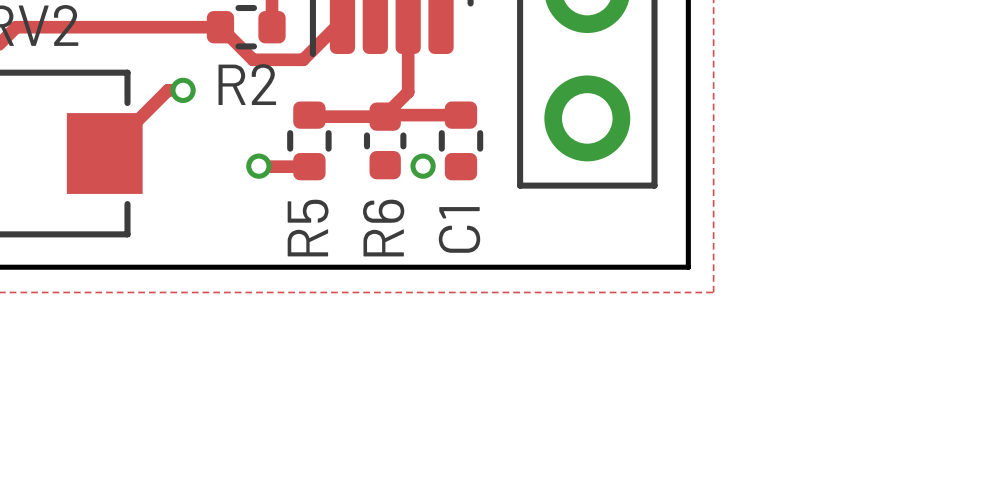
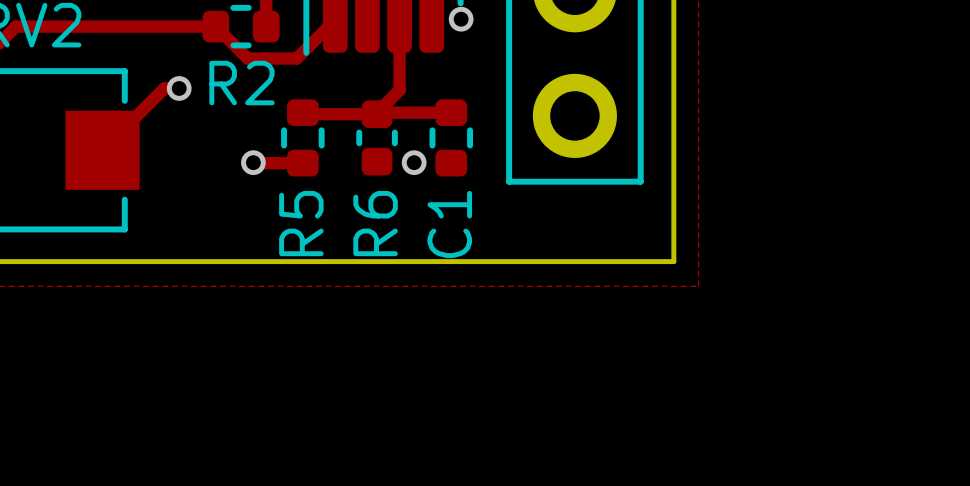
via: none -> (461, 19)

